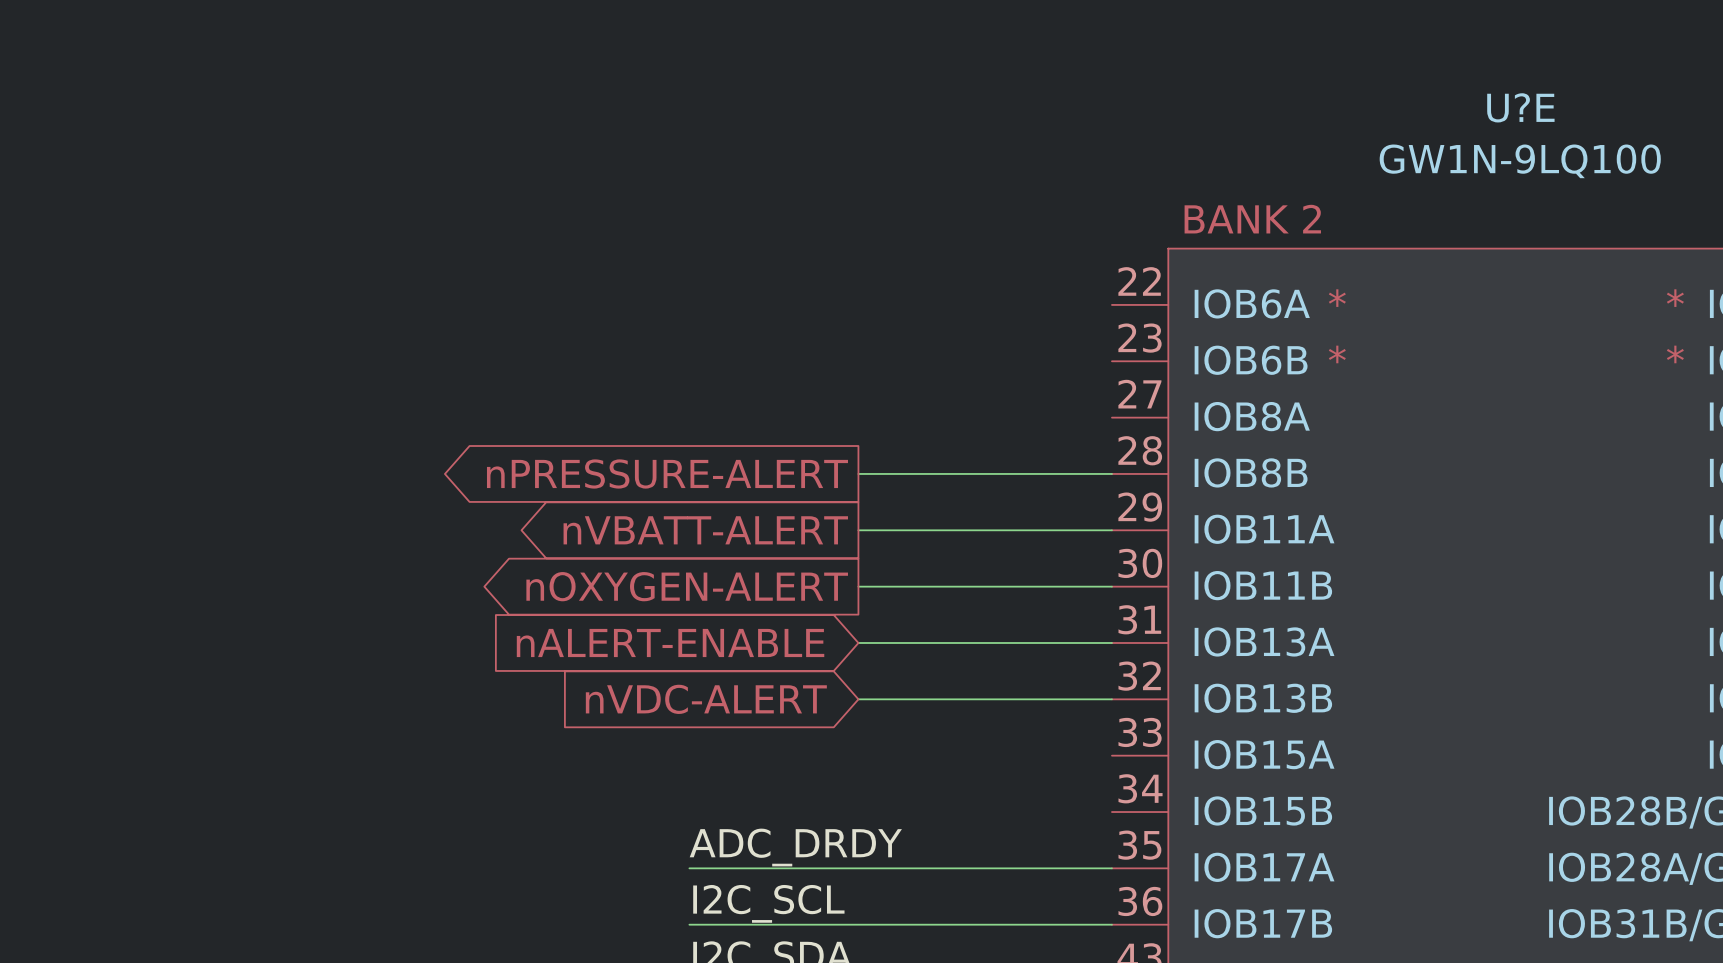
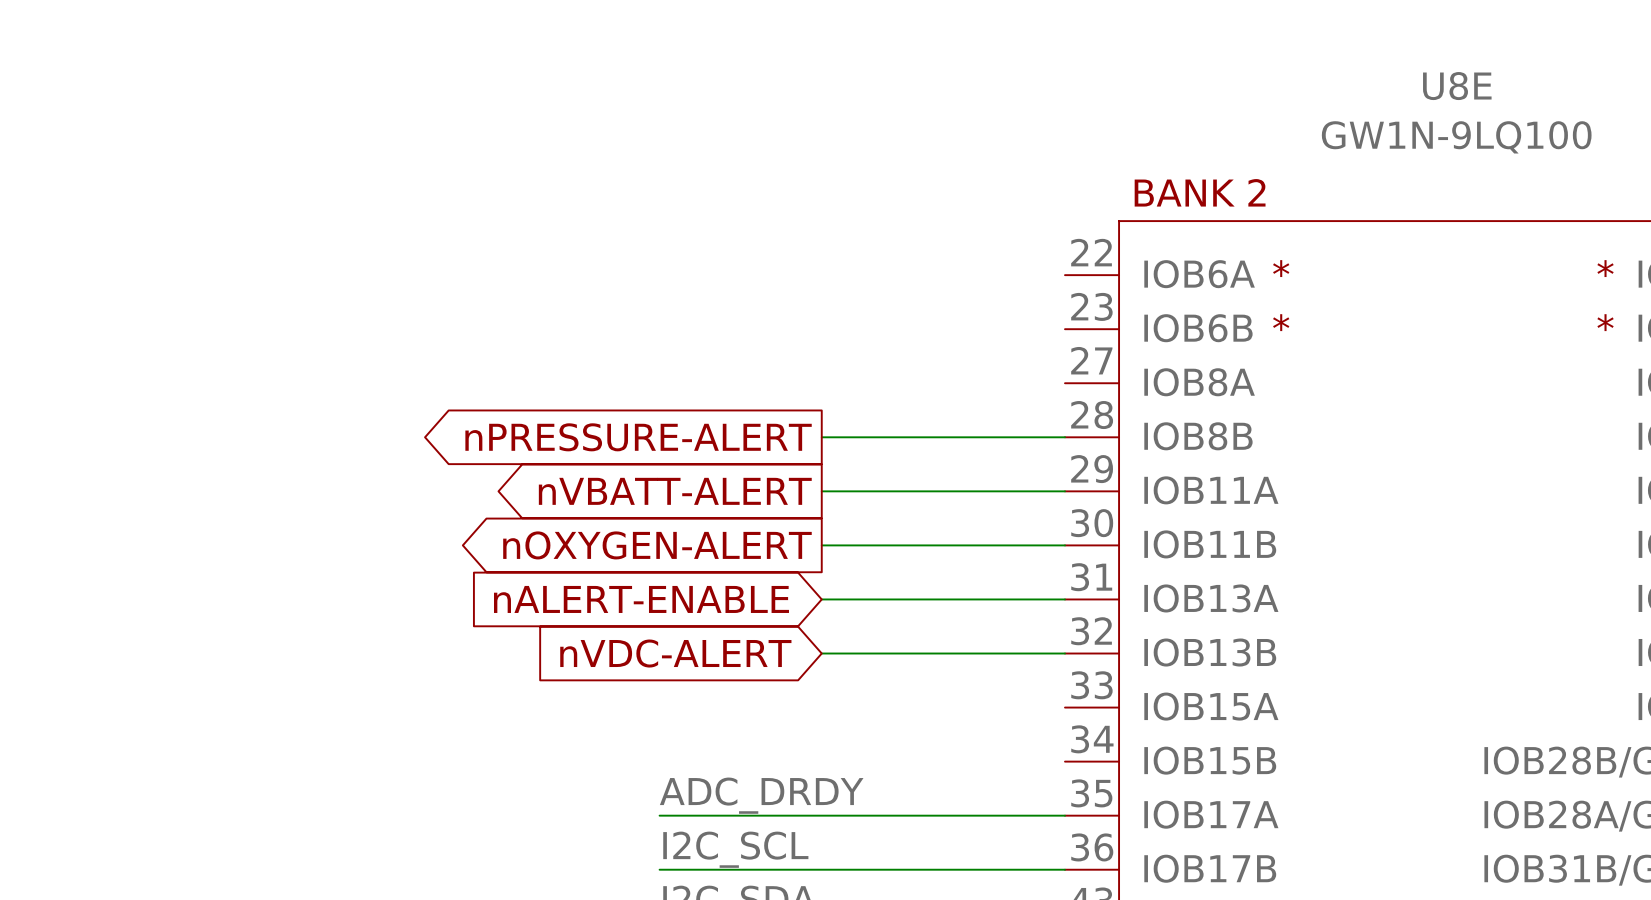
U?E name: U?E (1520, 107) -> U8E (1457, 86)

